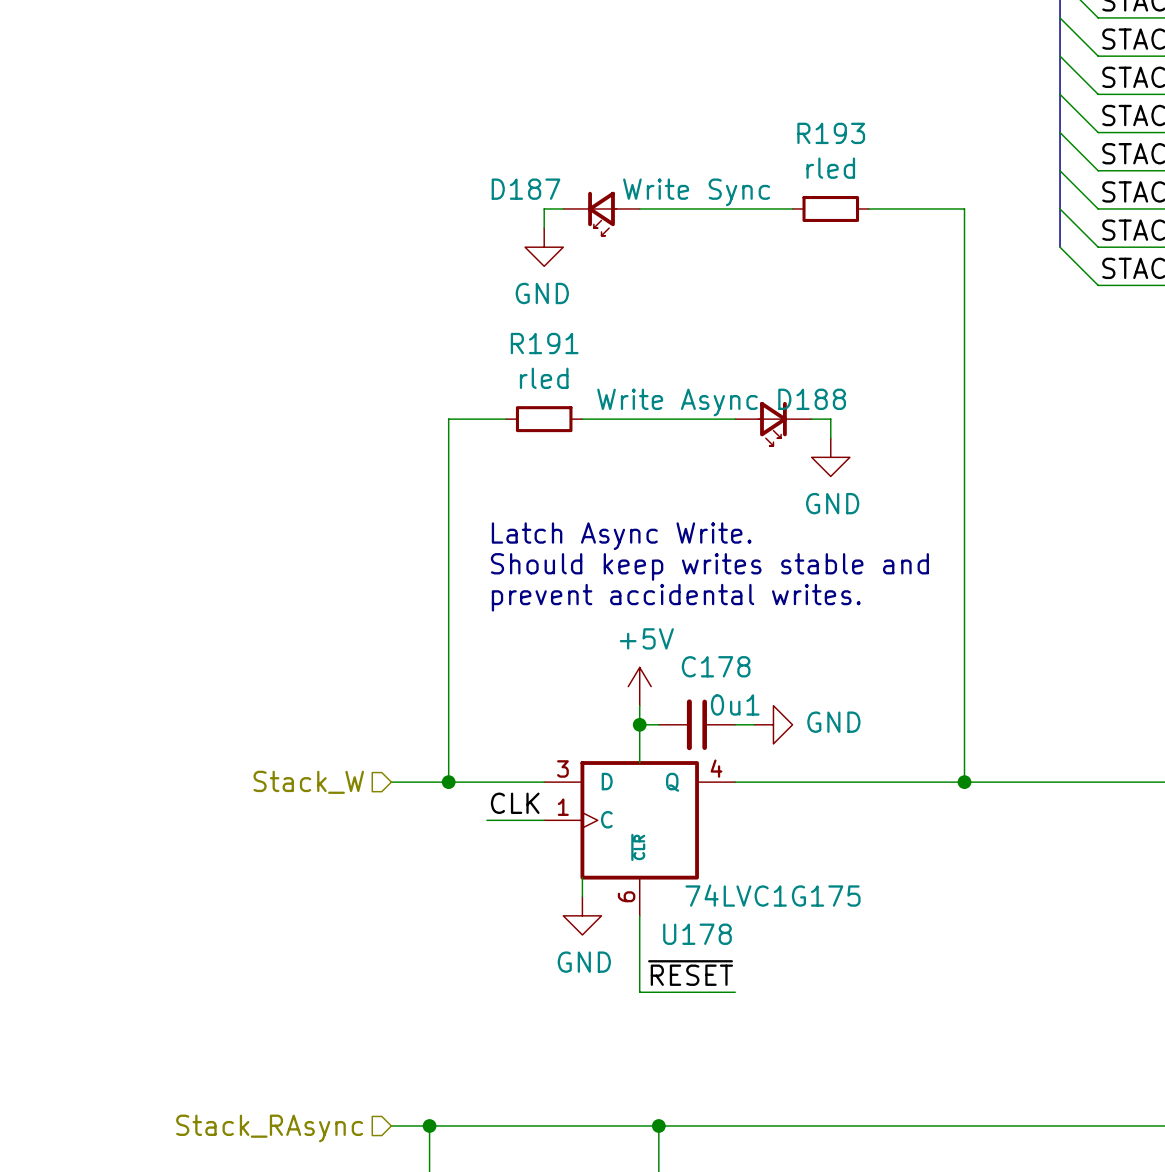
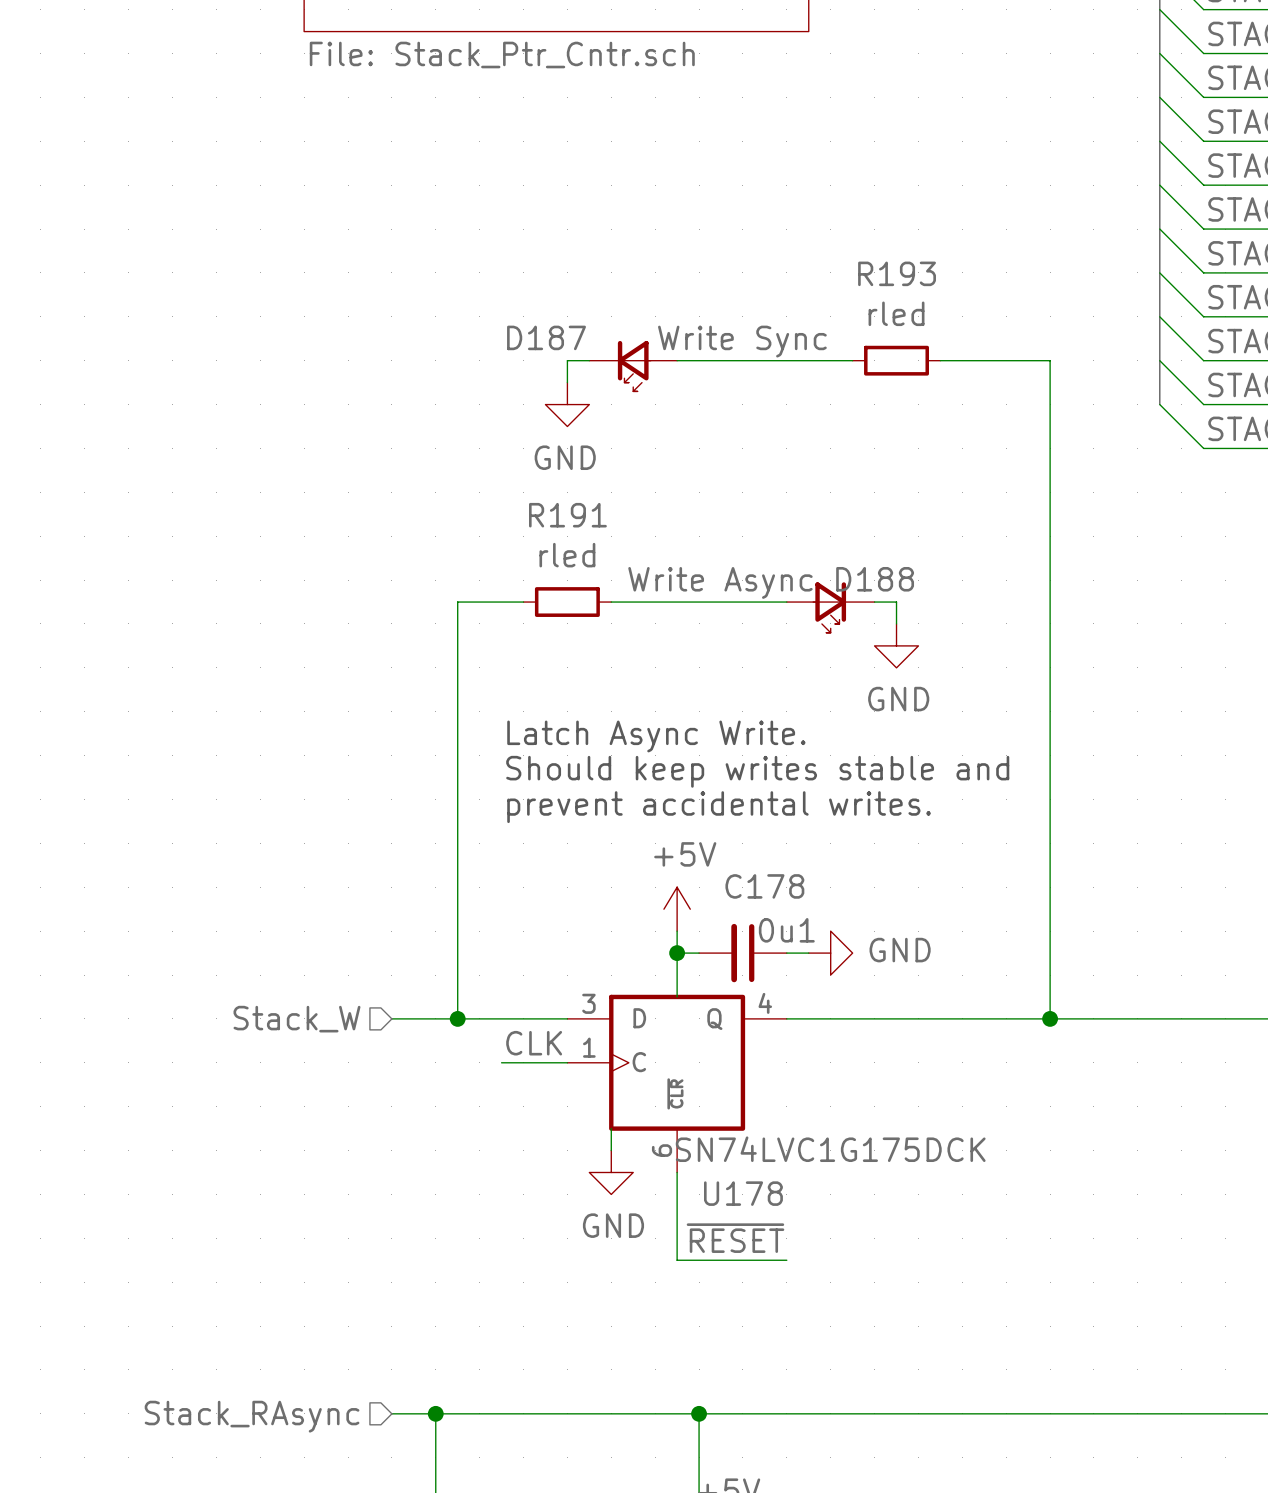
U178 value: 74LVC1G175 (773, 895) -> SN74LVC1G175DCK (830, 1149)

